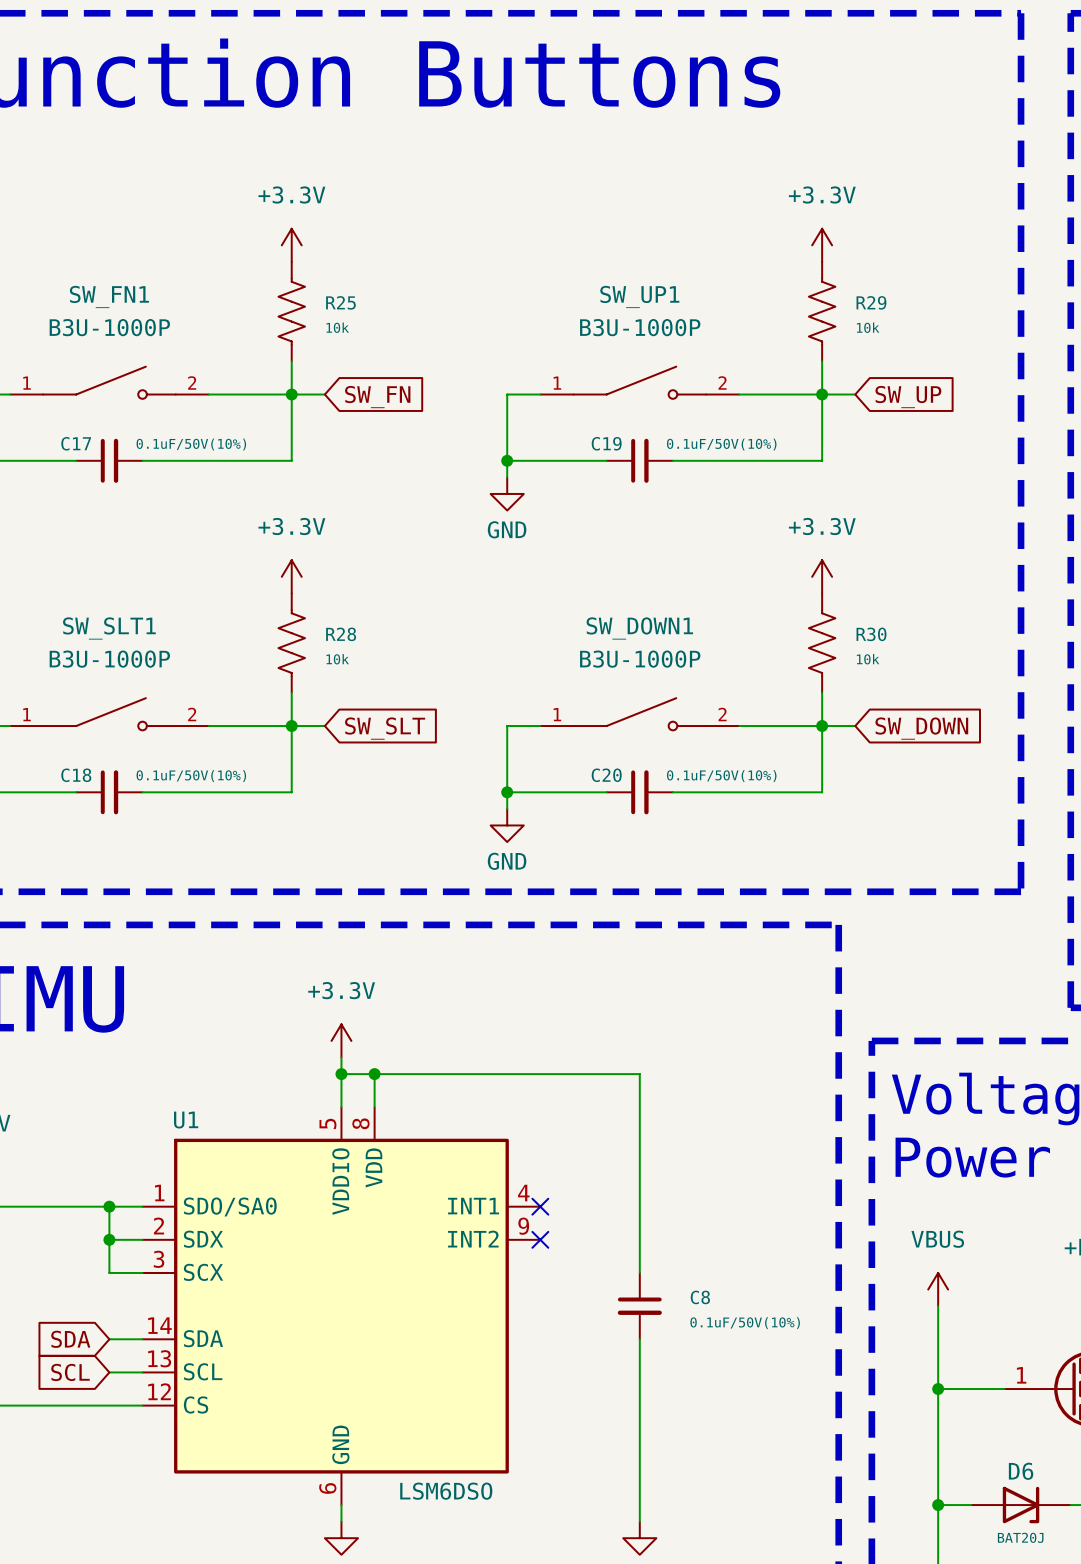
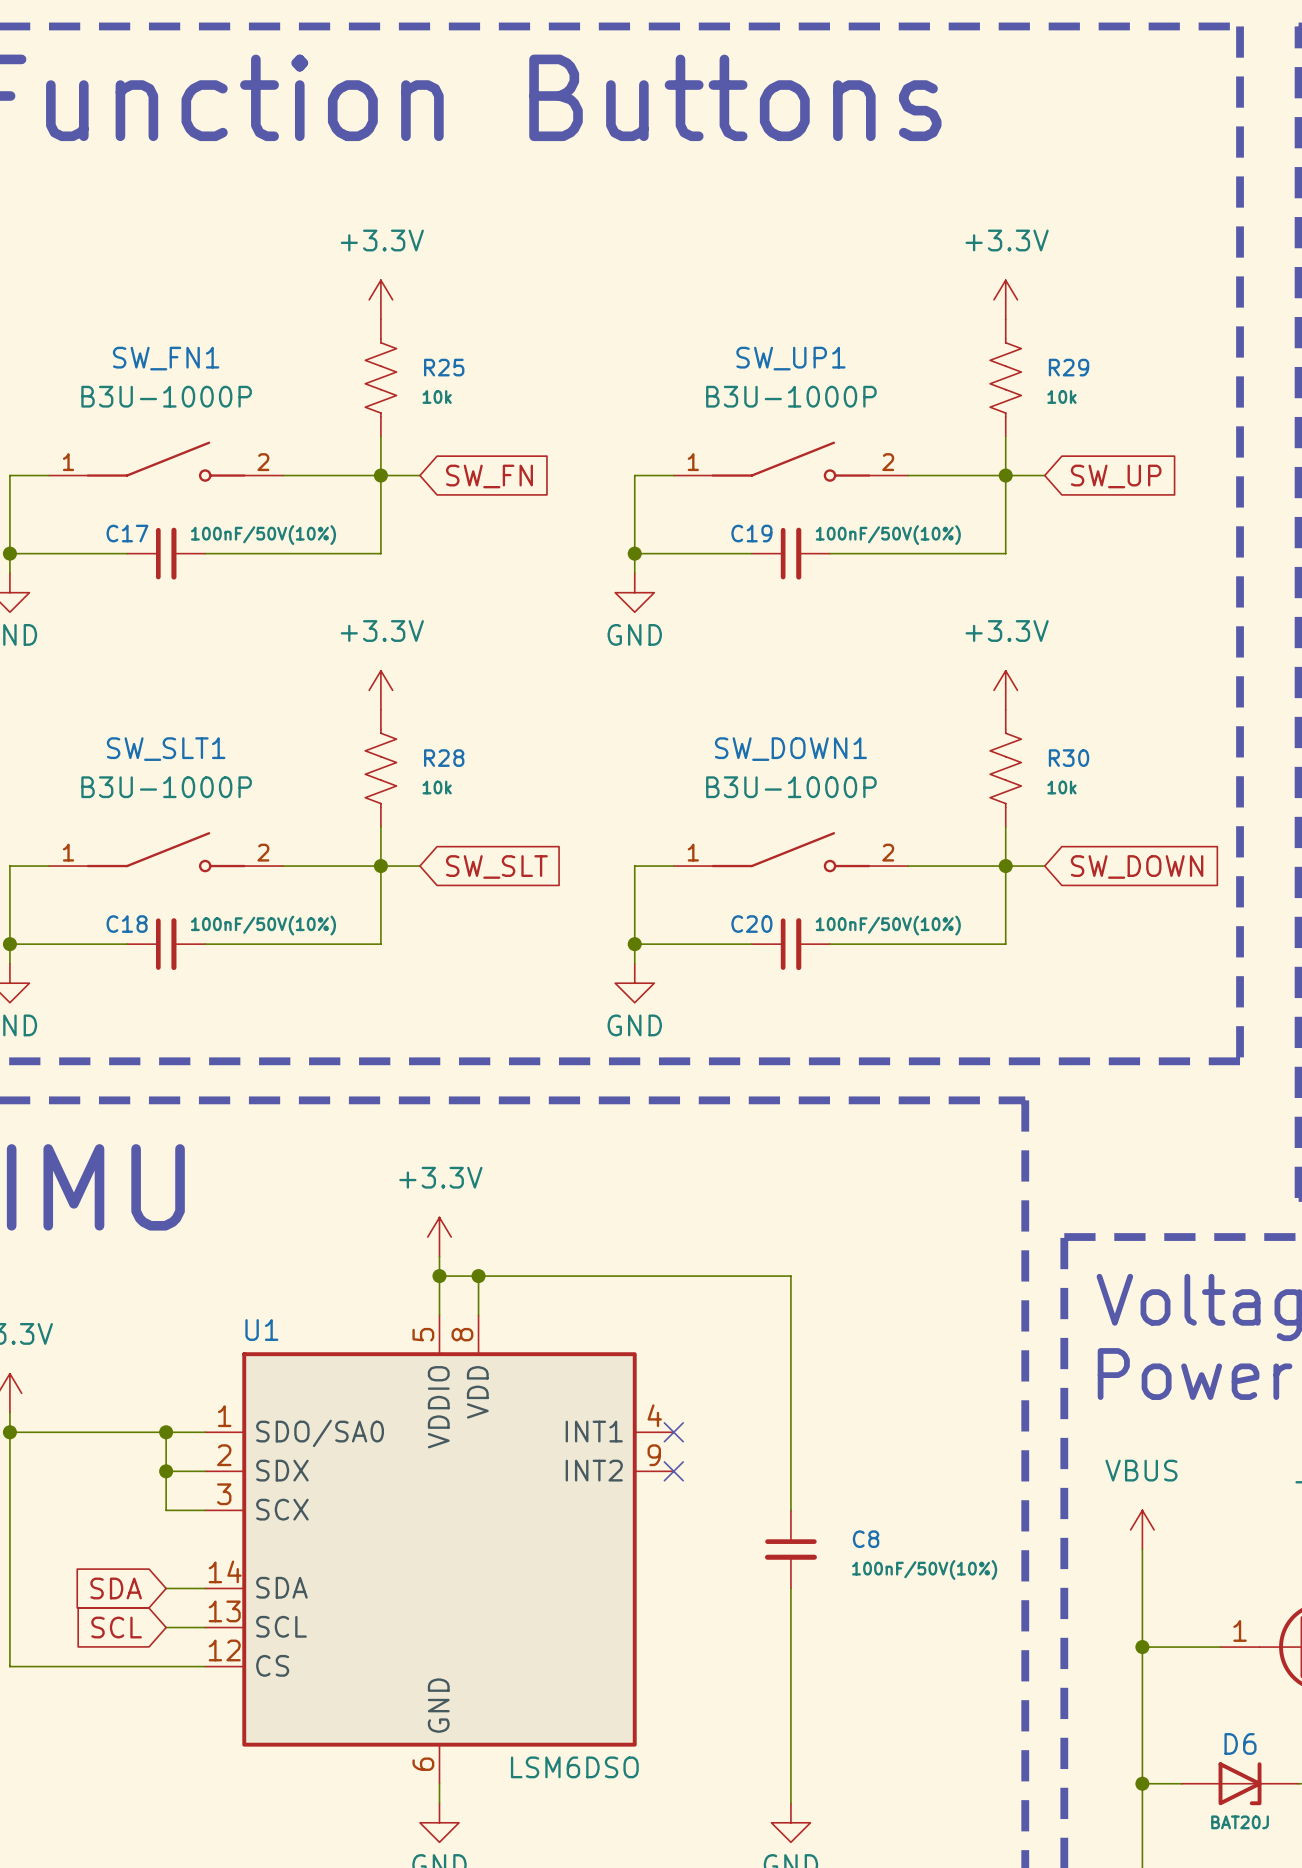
C17 value: 0.1uF/50V(10%) (191, 444) -> 100nF/50V(10%) (263, 535)
C19 value: 0.1uF/50V(10%) (721, 444) -> 100nF/50V(10%) (888, 535)
C18 value: 0.1uF/50V(10%) (191, 776) -> 100nF/50V(10%) (263, 925)
C20 value: 0.1uF/50V(10%) (721, 776) -> 100nF/50V(10%) (888, 925)
C8 value: 0.1uF/50V(10%) (745, 1323) -> 100nF/50V(10%) (924, 1569)

